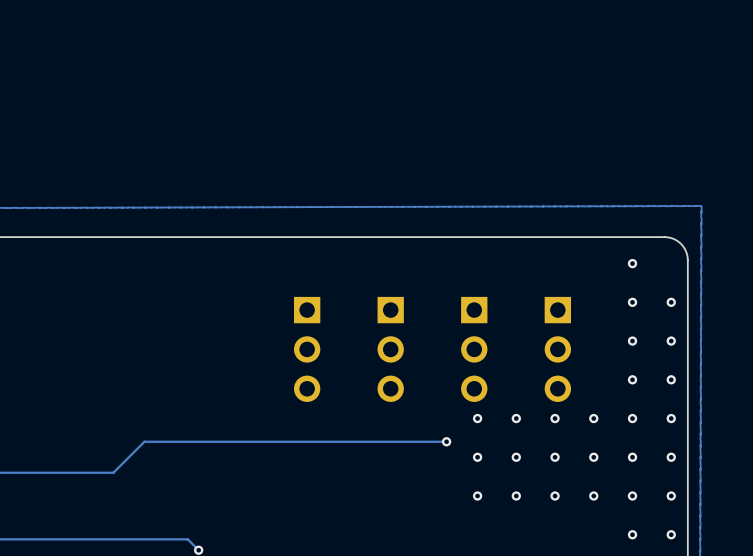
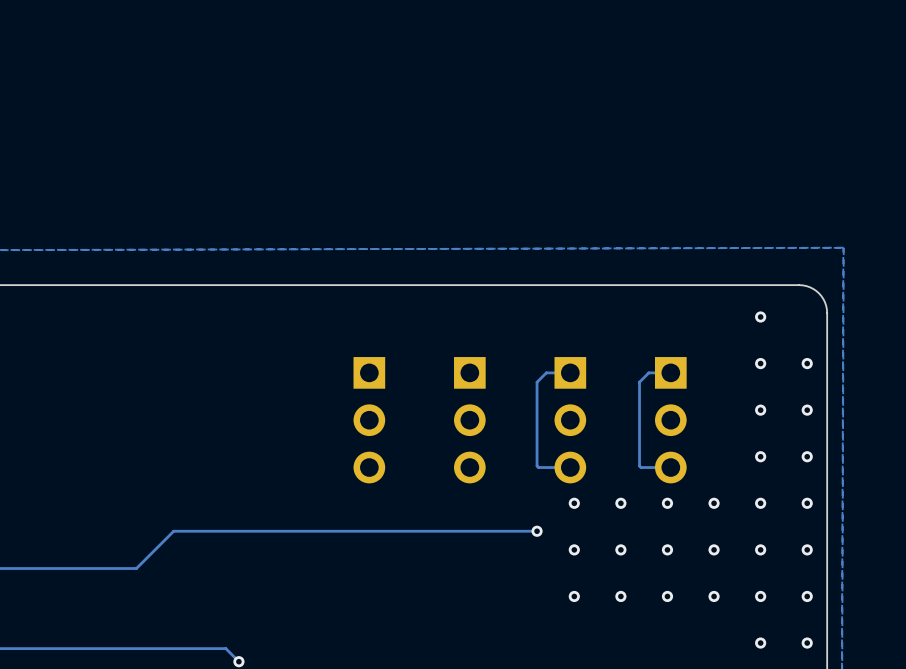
track: none -> (570, 372) (546, 372) (537, 382) (537, 466) (570, 467)
track: none -> (670, 372) (648, 372) (639, 382) (639, 466) (670, 467)

